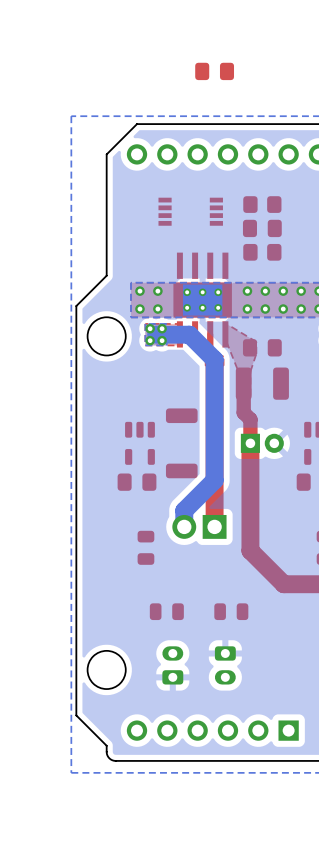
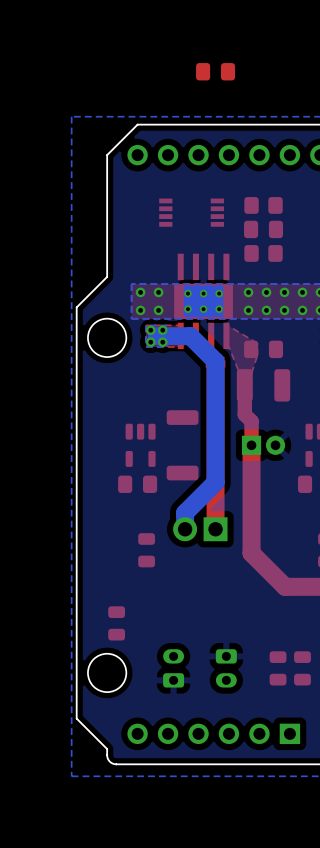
part rotation: 0° (166, 611) -> 90° clockwise (116, 623)
part position: (166, 611) -> (116, 623)
part: (231, 611) -> none
part: none -> (278, 668)
part: none -> (302, 668)

